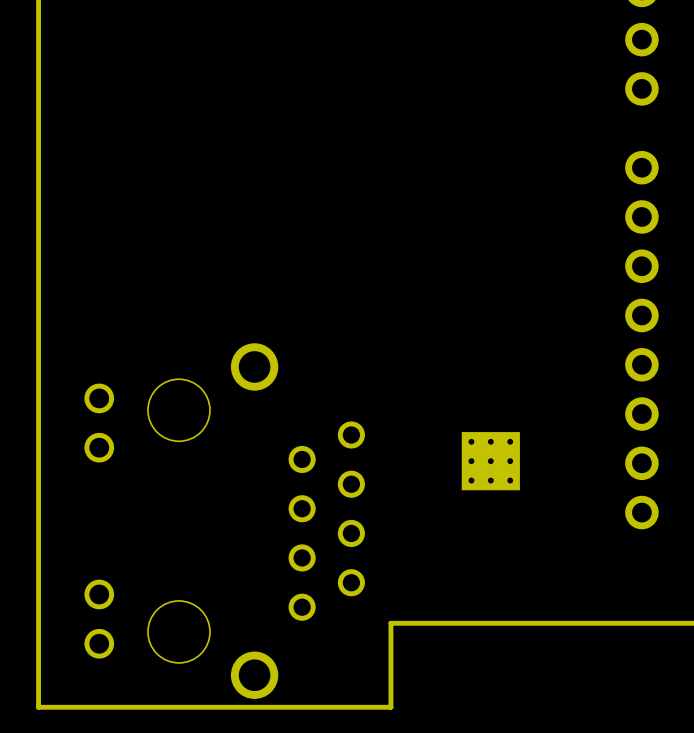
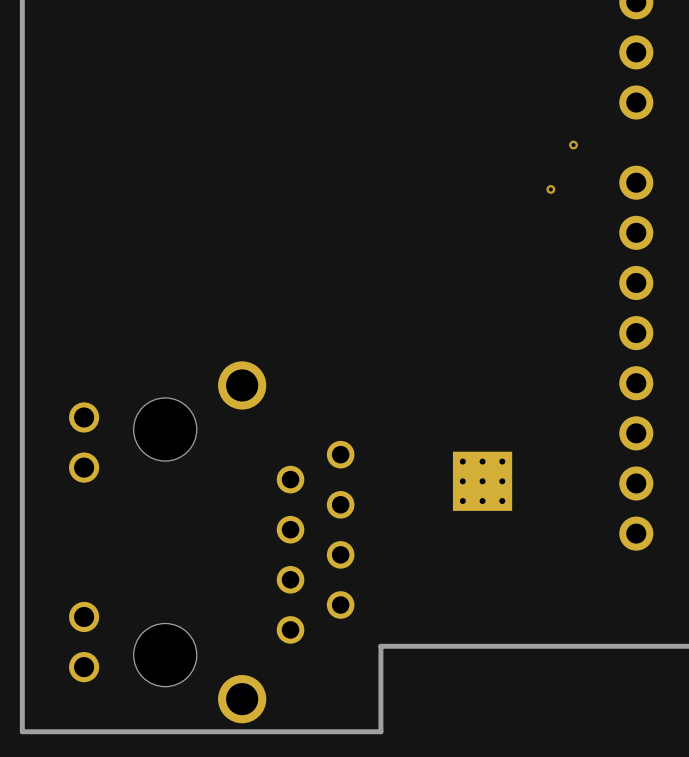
via: none -> (573, 145)
via: none -> (550, 189)

